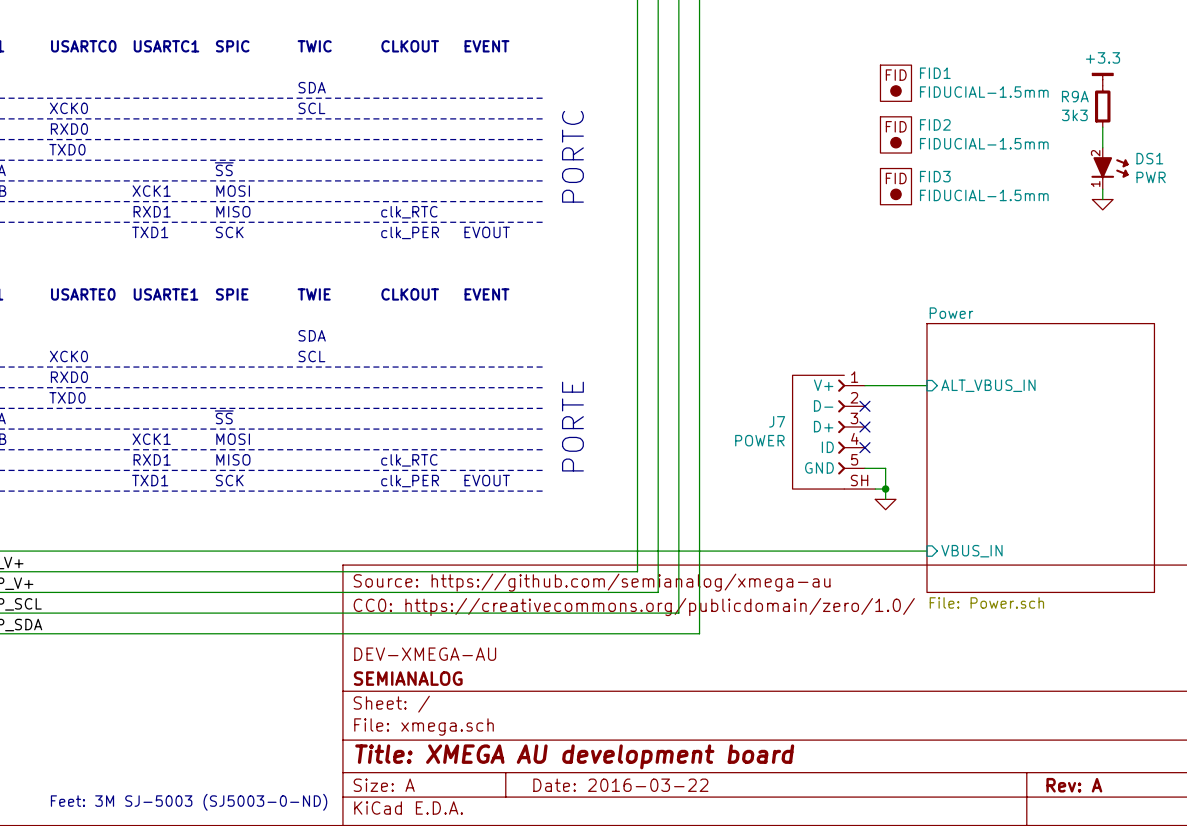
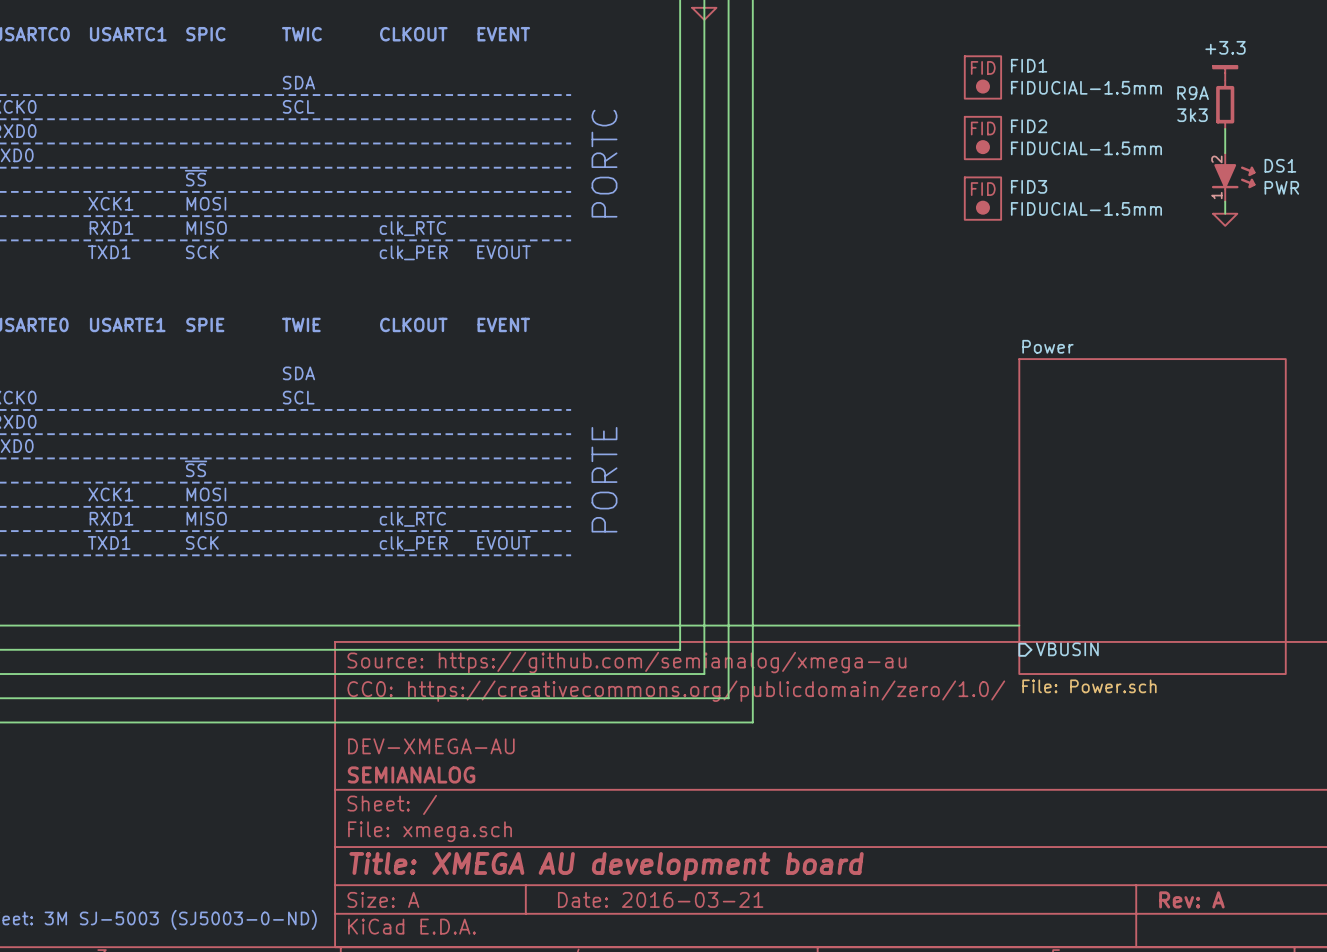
power symbol: none -> (704, 13)
wire: (864, 385) (926, 385) -> none
sheet pin: ALT_VBUS_IN (988, 385) -> none
no-connect mark: (864, 406) -> none
no-connect mark: (864, 426) -> none
J7: POWER (833, 432) -> none
no-connect mark: (864, 447) -> none
wire: (864, 468) (885, 468) (885, 499) -> none
wire: (875, 489) (885, 489) -> none
junction: (885, 489) -> none
power symbol: (885, 504) -> none
sheet pin: VBUS_IN (971, 551) -> VBUSIN (1067, 649)
title block: Date: 2016-03-22 (620, 785) -> Date: 2016-03-21 (660, 899)

